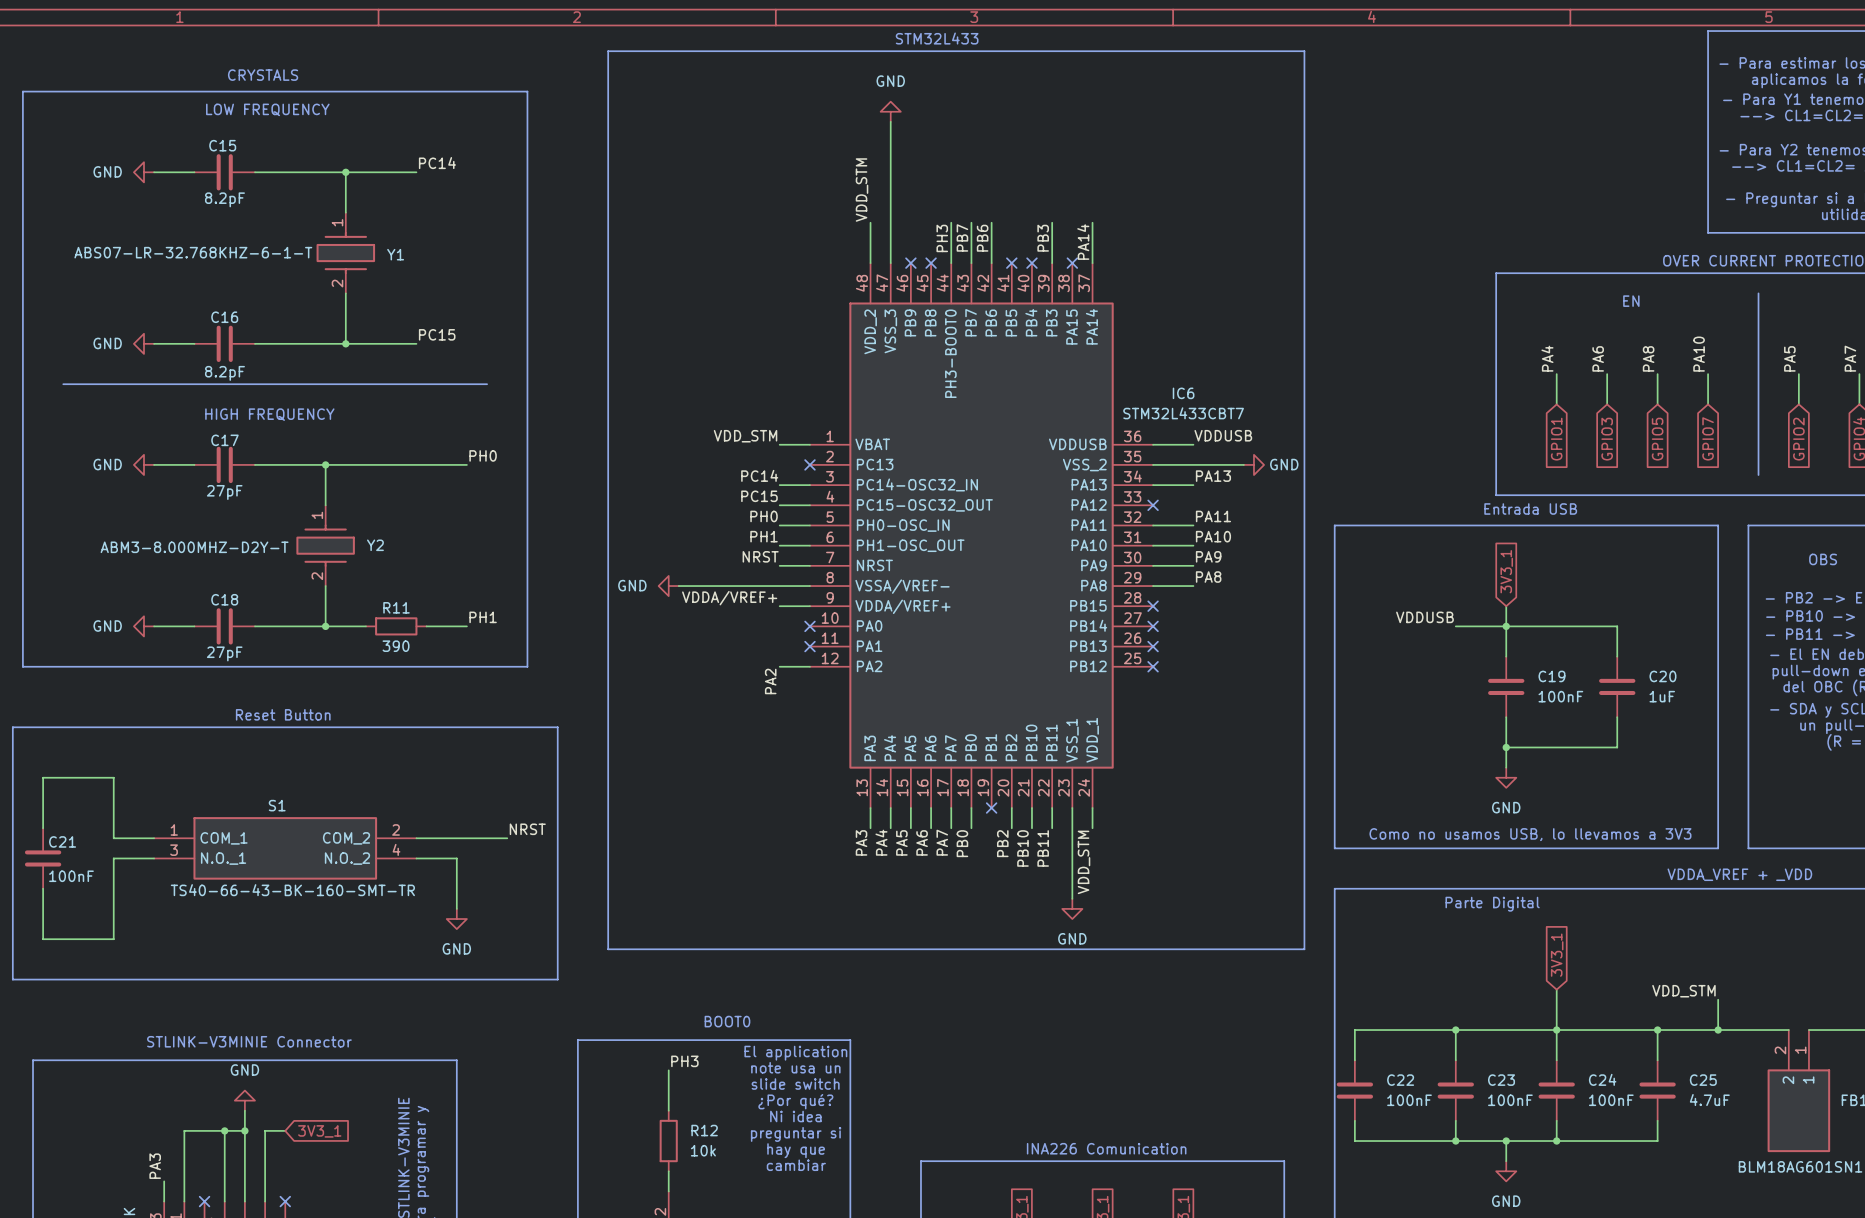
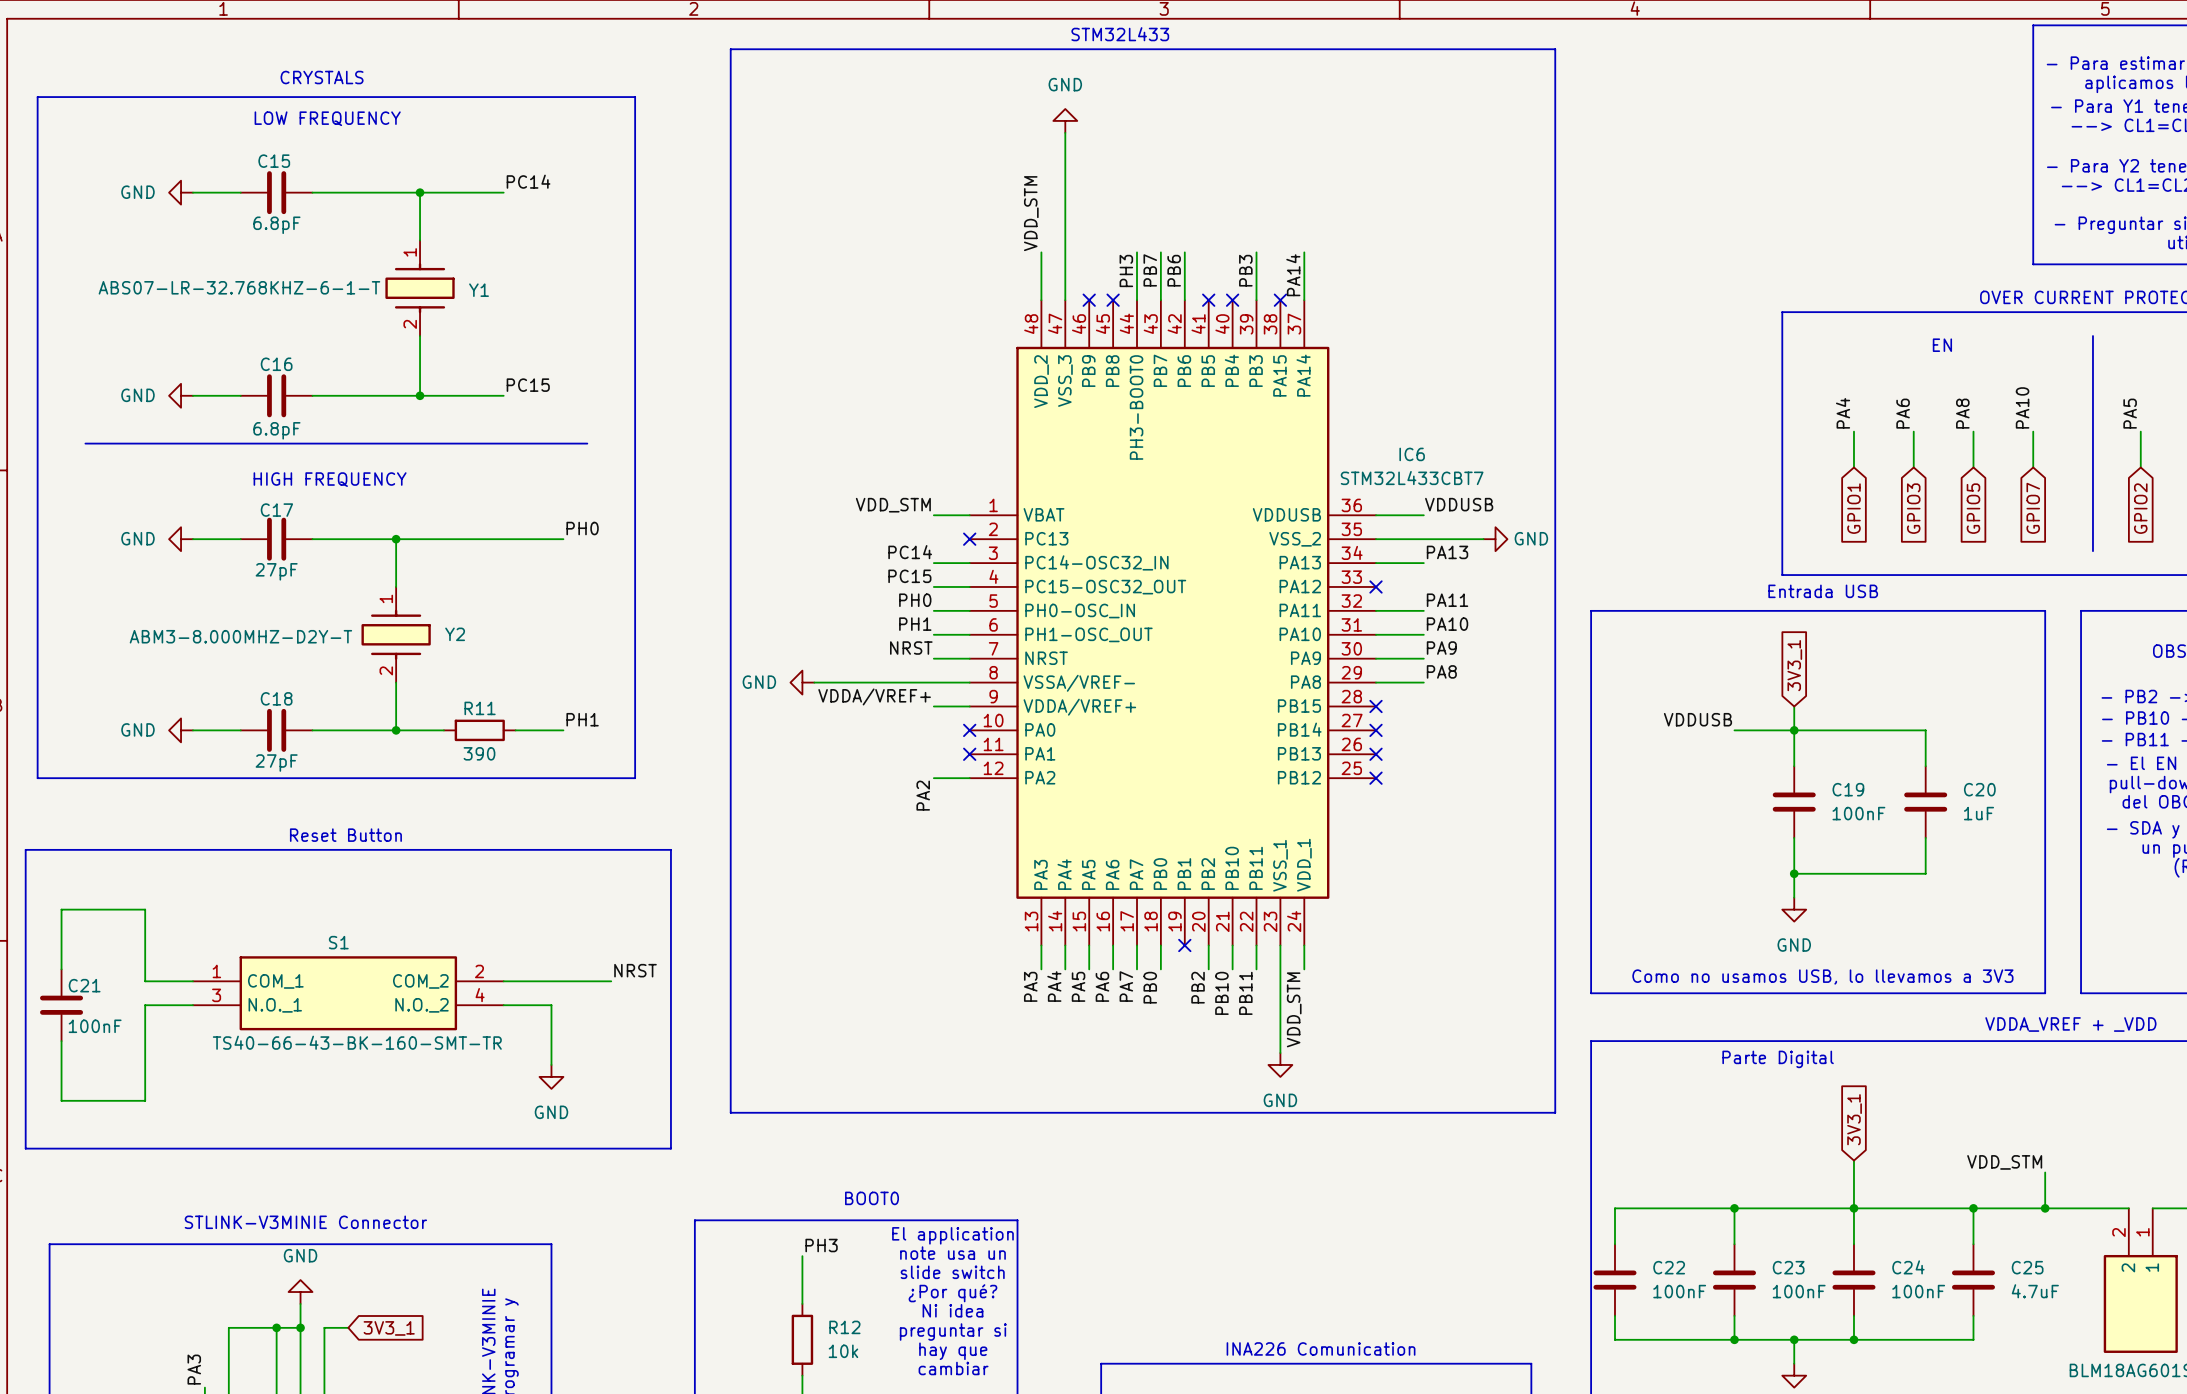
C15 value: 8.2pF (224, 199) -> 6.8pF (276, 225)
C16 value: 8.2pF (224, 373) -> 6.8pF (276, 430)

